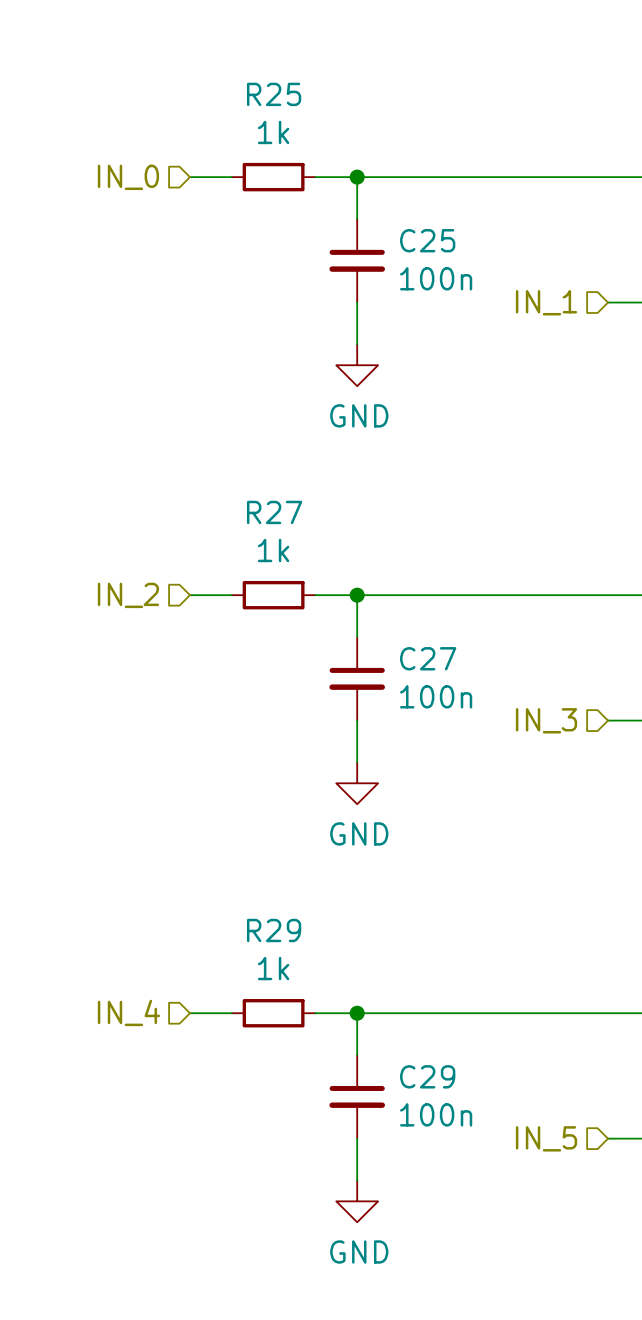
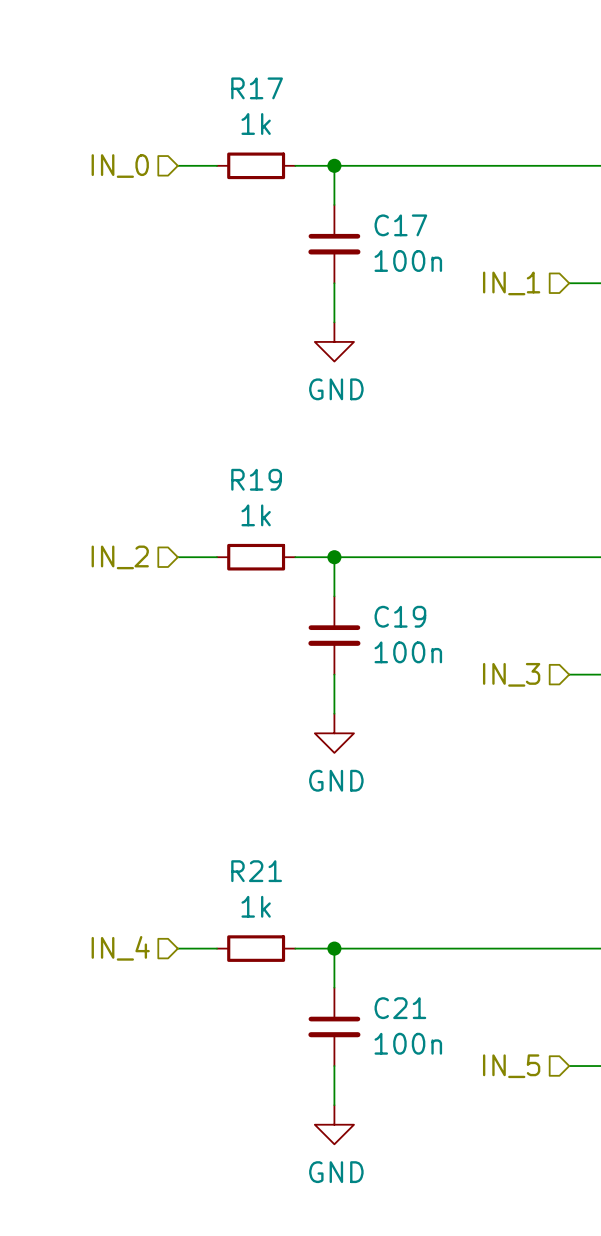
R25 name: R25 (274, 94) -> R17 (257, 88)
C25 name: C25 (427, 240) -> C17 (400, 225)
R27 name: R27 (274, 512) -> R19 (256, 479)
C27 name: C27 (428, 658) -> C19 (400, 616)
R29 name: R29 (274, 930) -> R21 (256, 871)
C29 name: C29 (427, 1076) -> C21 (400, 1008)

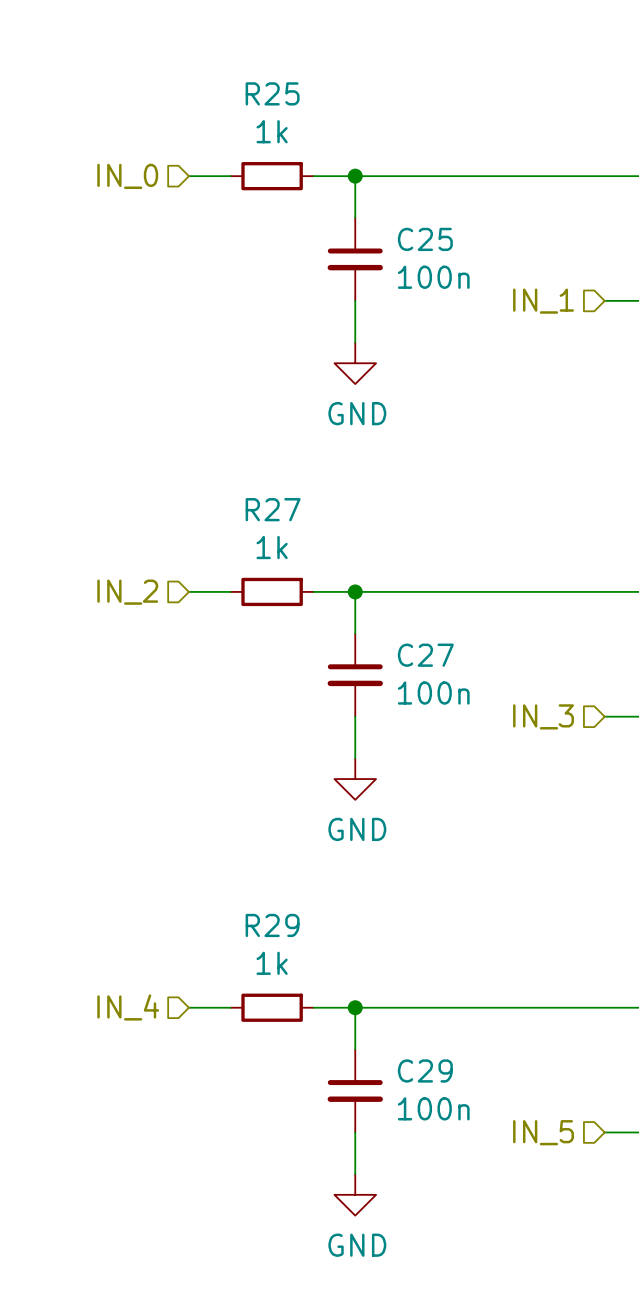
R17 name: R17 (257, 88) -> R25 (272, 93)
C17 name: C17 (400, 225) -> C25 (425, 239)
R19 name: R19 (256, 479) -> R27 (273, 509)
C19 name: C19 (400, 616) -> C27 (425, 655)
R21 name: R21 (256, 871) -> R29 (272, 925)
C21 name: C21 (400, 1008) -> C29 (425, 1070)

